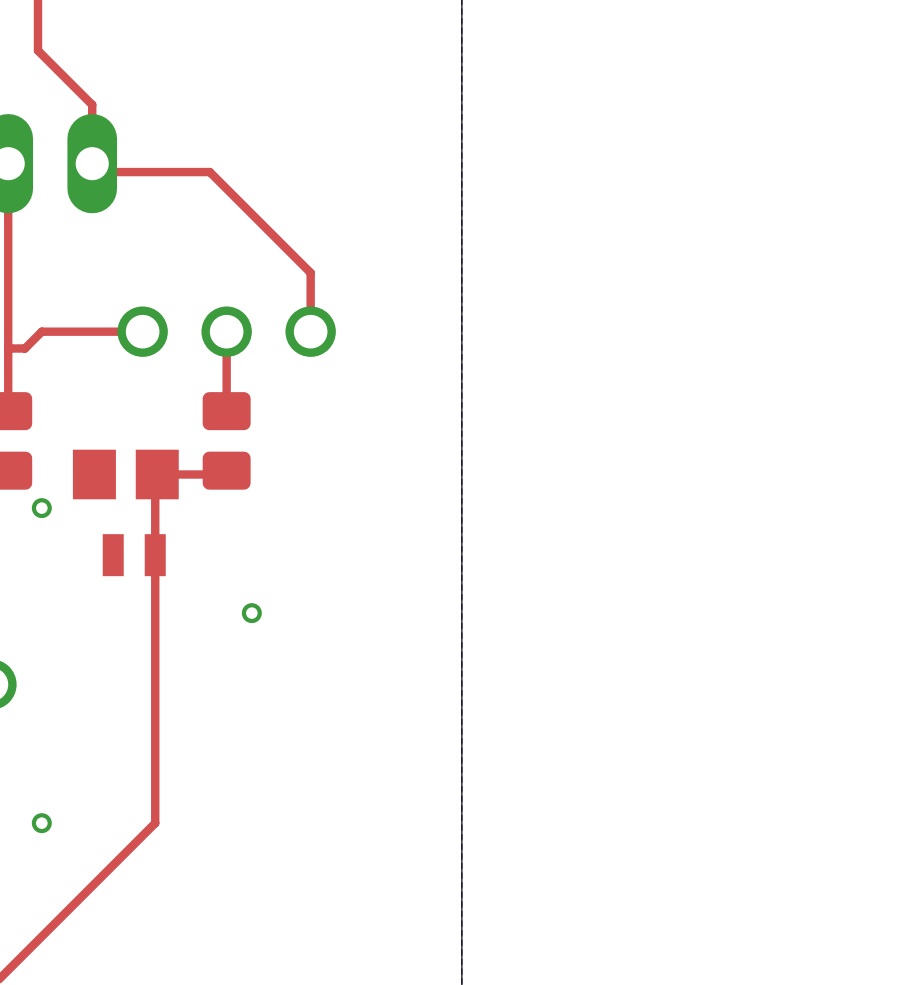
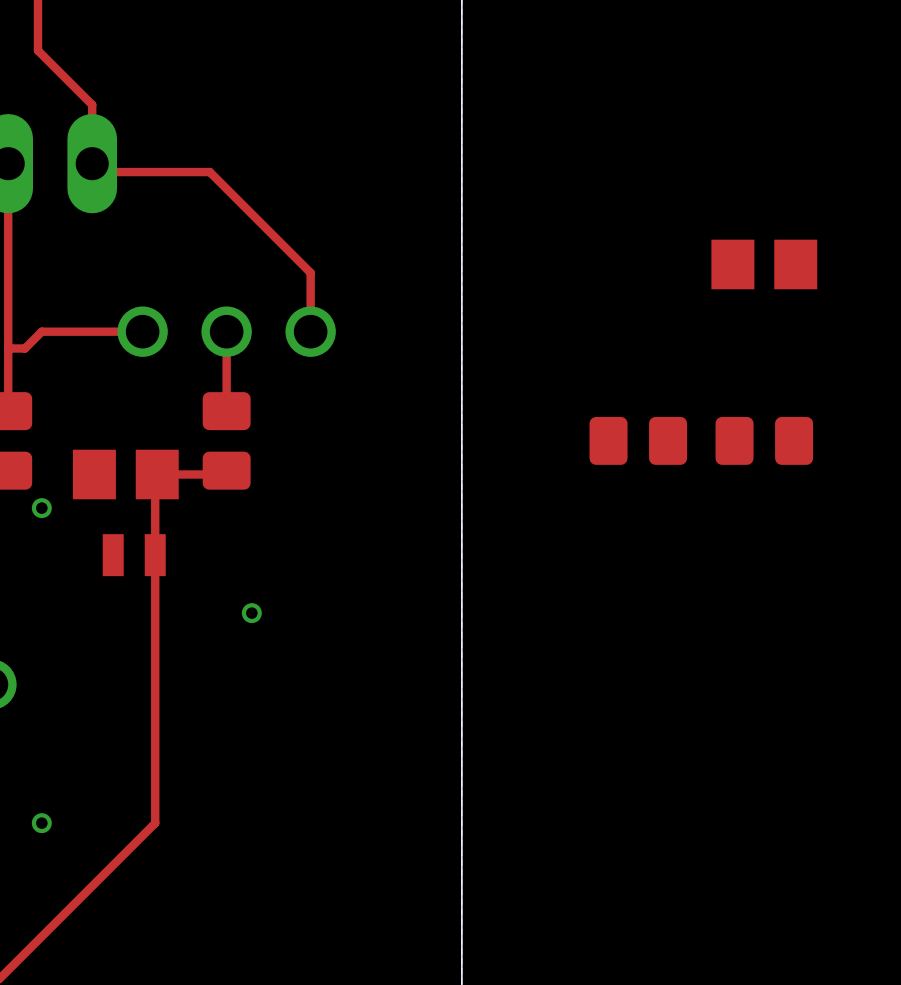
part: none -> (764, 264)
part: none -> (638, 440)
part: none -> (764, 440)

